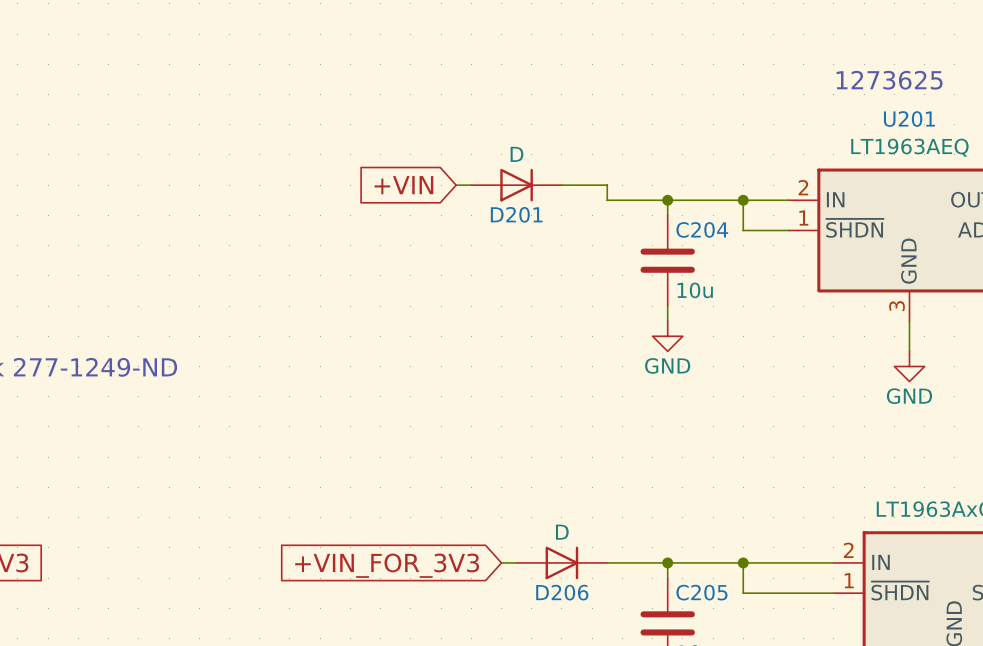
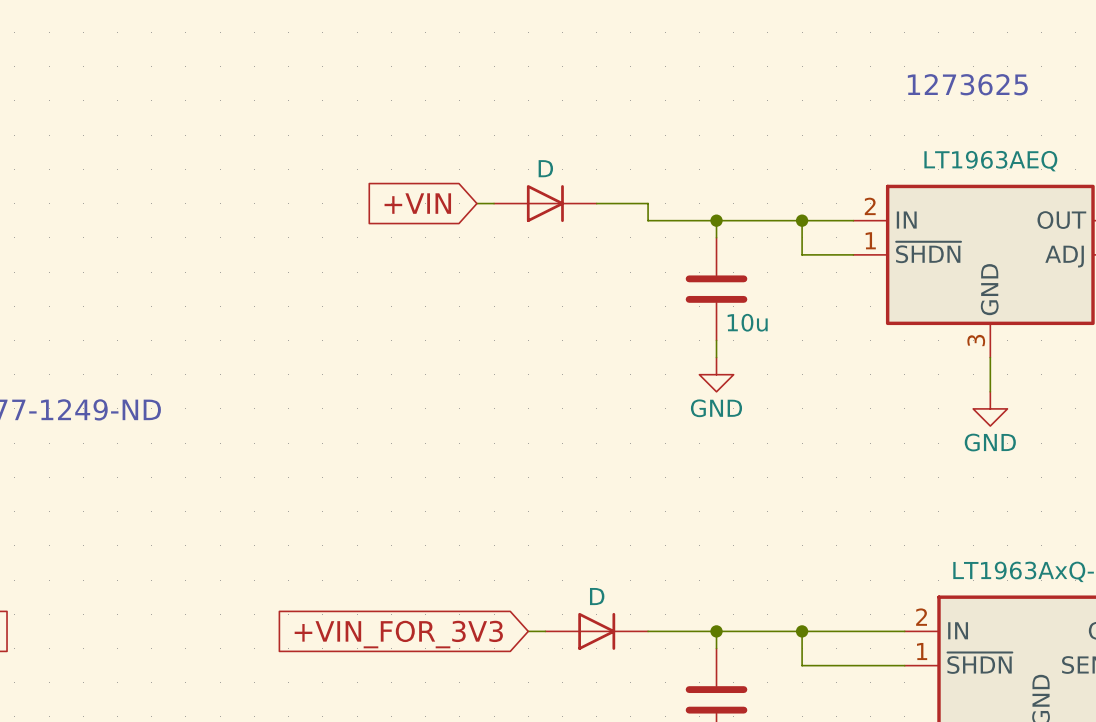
U201 name: U201 (909, 119) -> none
D201 name: D201 (516, 214) -> none
C204 name: C204 (702, 229) -> none
D206 name: D206 (562, 592) -> none
C205 name: C205 (701, 592) -> none

